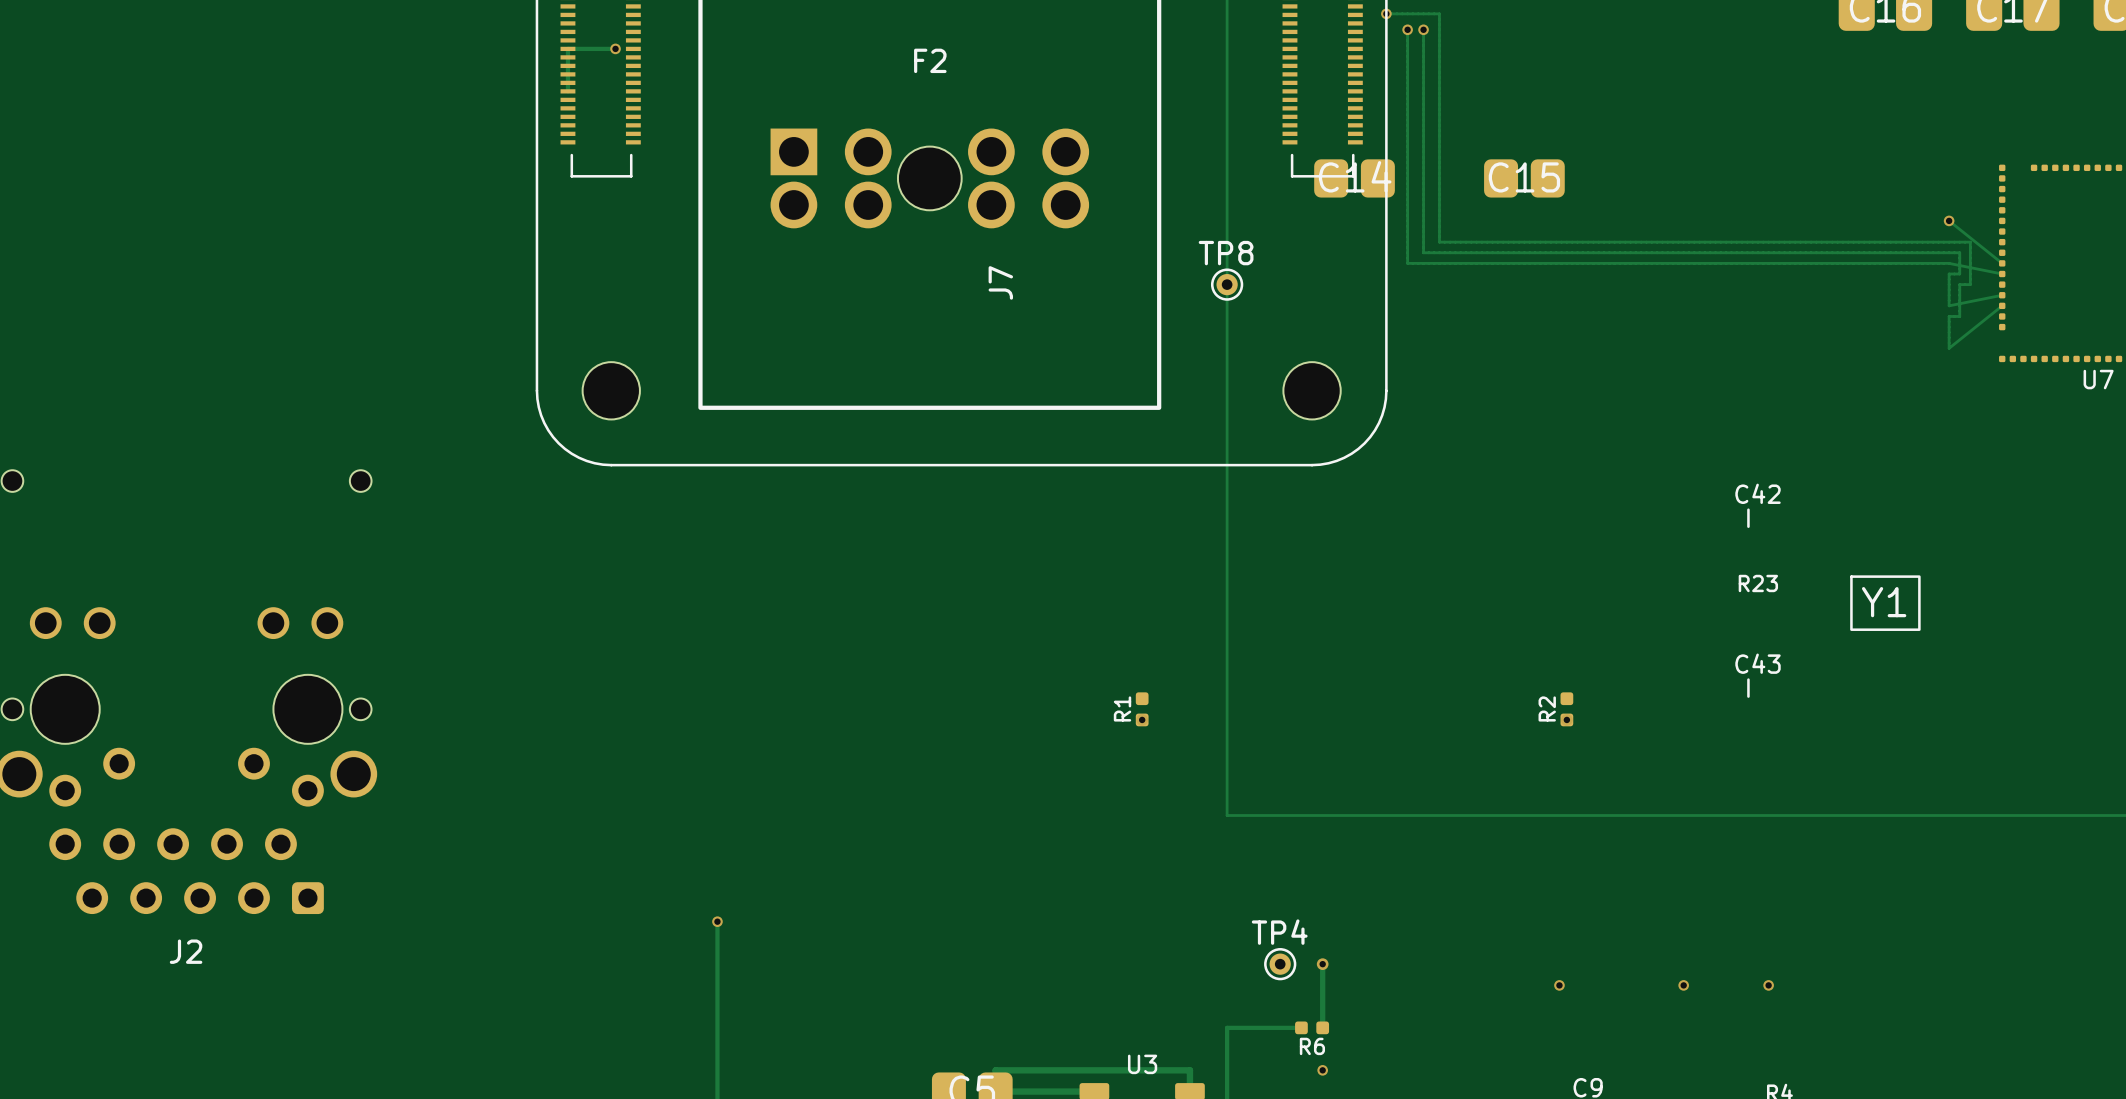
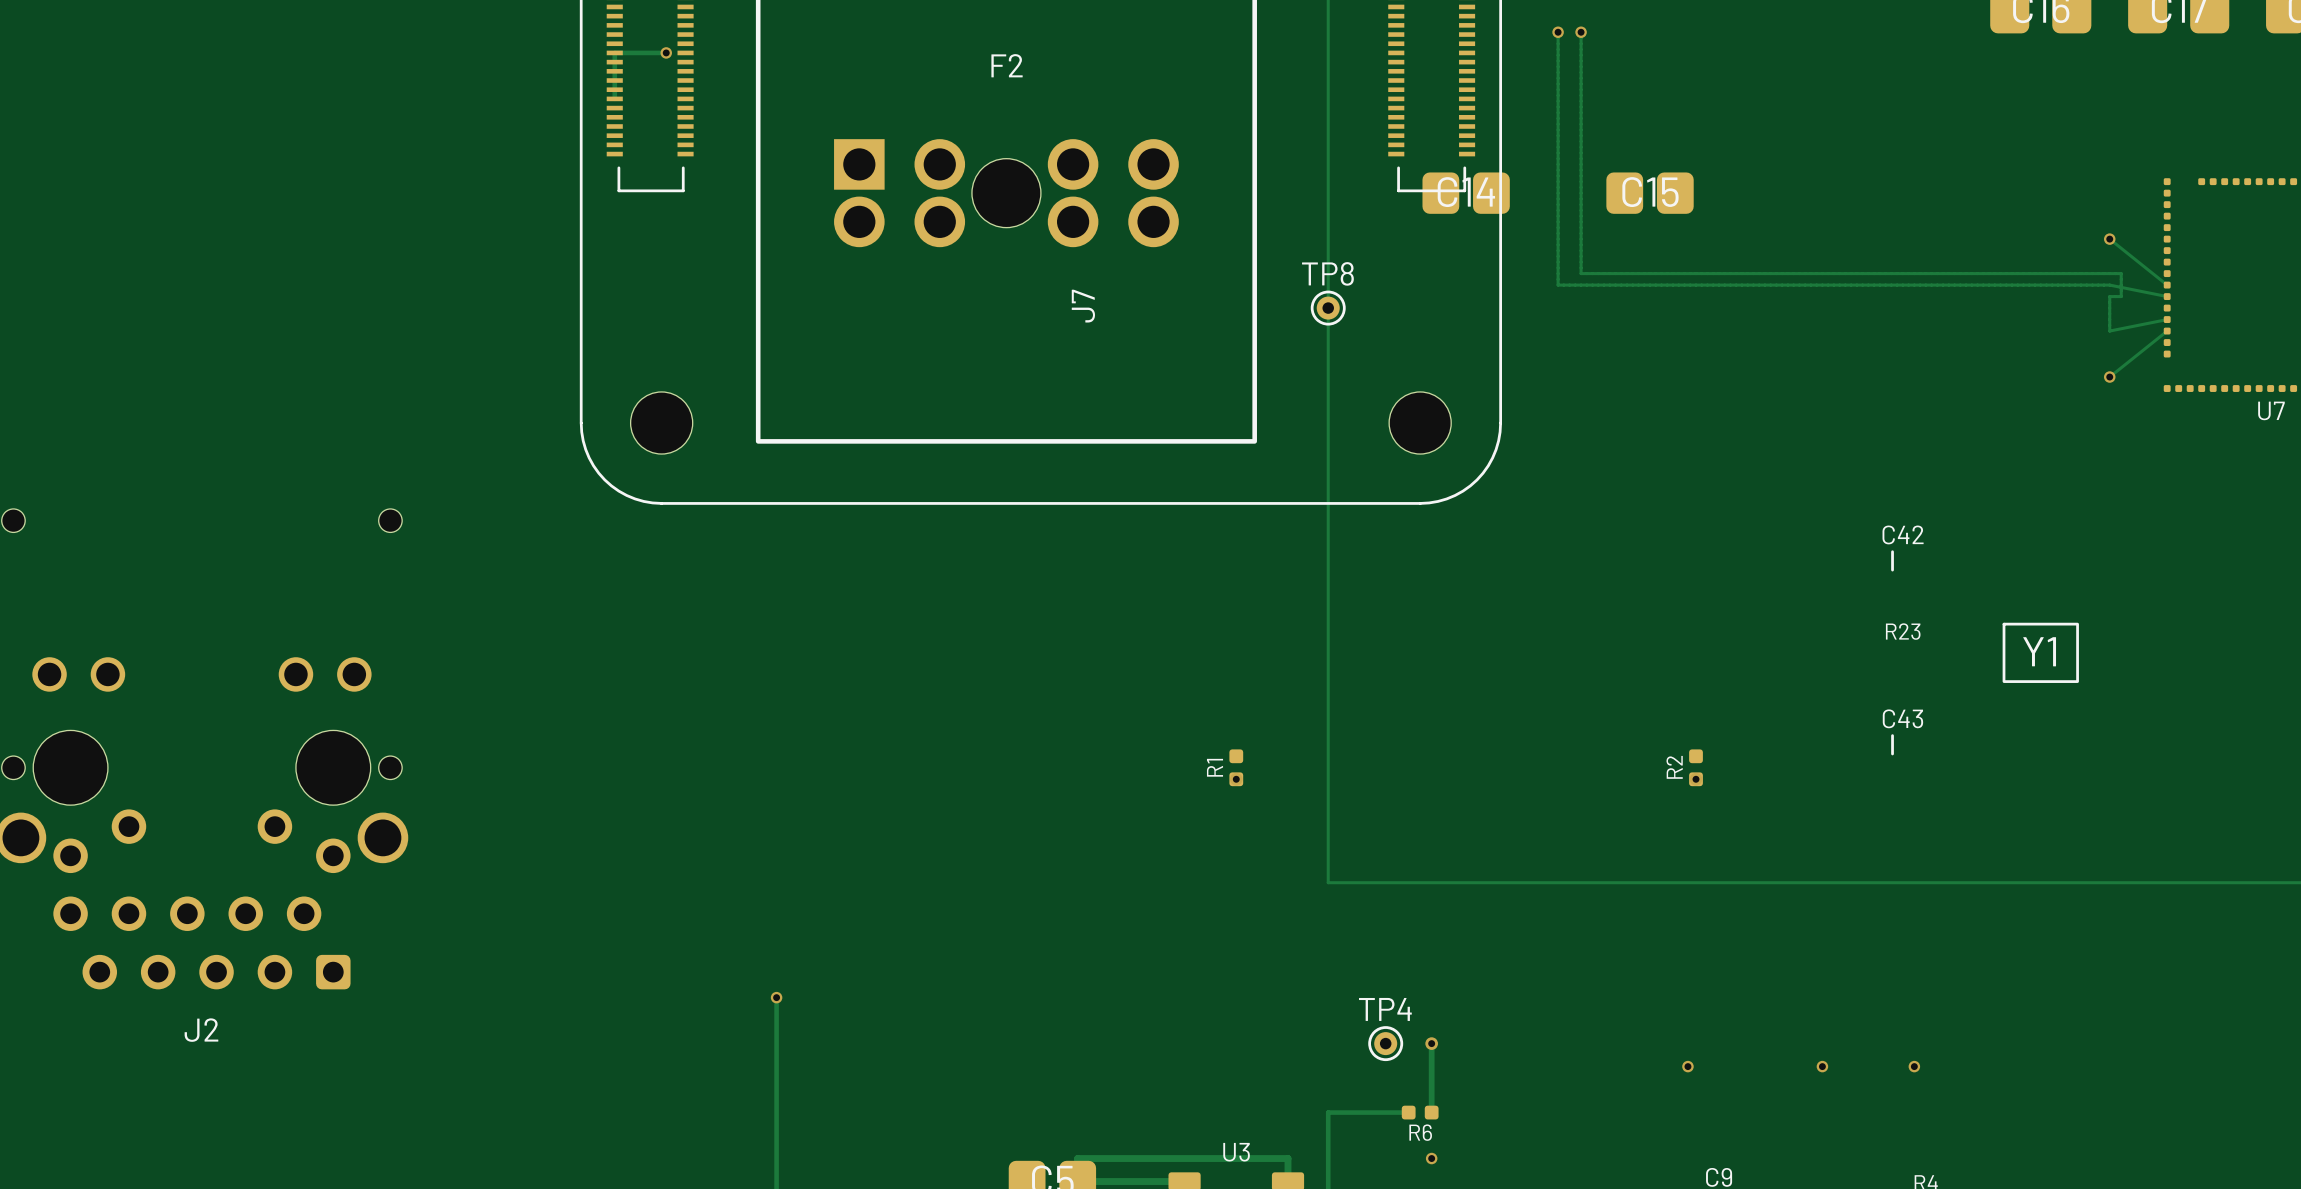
track: (1386, 13) (1439, 13) (1439, 29) -> none
via: (1386, 13) -> none
track: (1407, 29) (1407, 263) (1439, 263) -> (1558, 262) (1558, 285)
via: (1407, 29) -> none
track: (1423, 29) (1423, 252) (1460, 252) -> (1581, 32) (1581, 273)
via: (1423, 29) -> none
via: none -> (1558, 32)
via: none -> (1581, 32)
track: (1439, 242) (1970, 242) (1970, 284) (1959, 284) (1959, 316) (1949, 316) (1949, 348) -> none
via: none -> (2109, 377)

